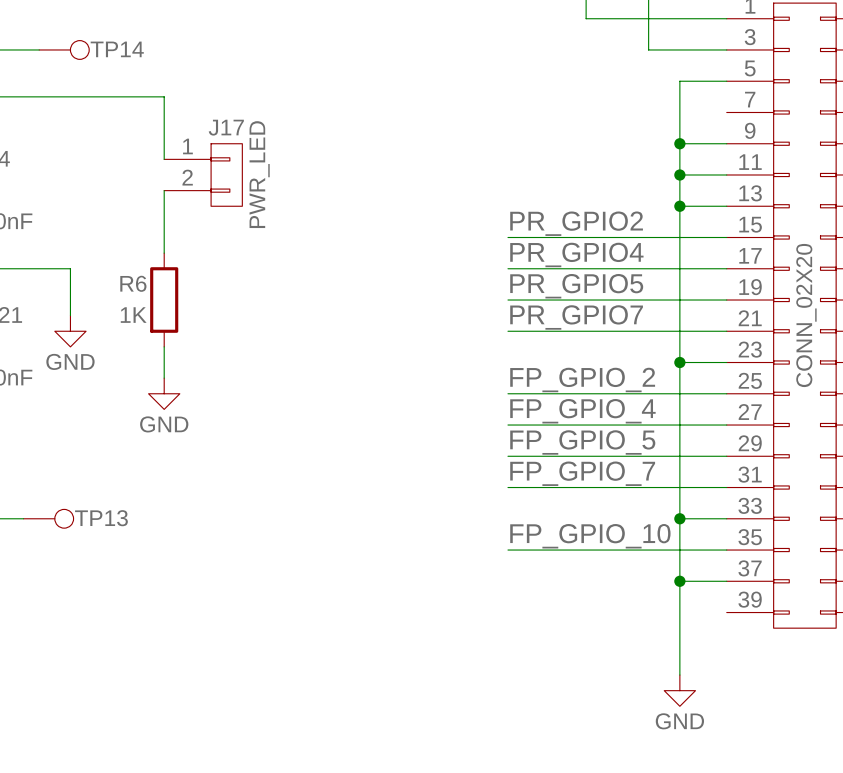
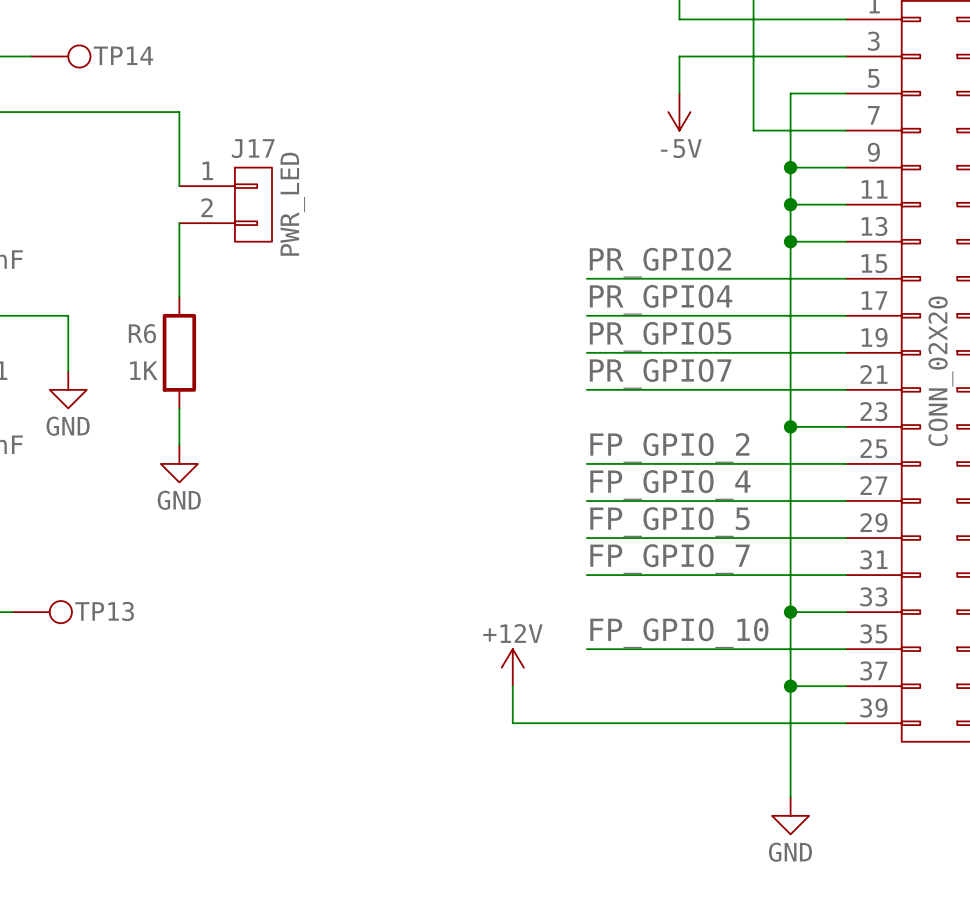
wire: none -> (679, 93) (679, 56) (753, 56) (753, 130) (846, 130)
power symbol: none -> -5V (679, 112)
power symbol: none -> +12V (512, 667)
wire: none -> (512, 686) (512, 723) (846, 723)

